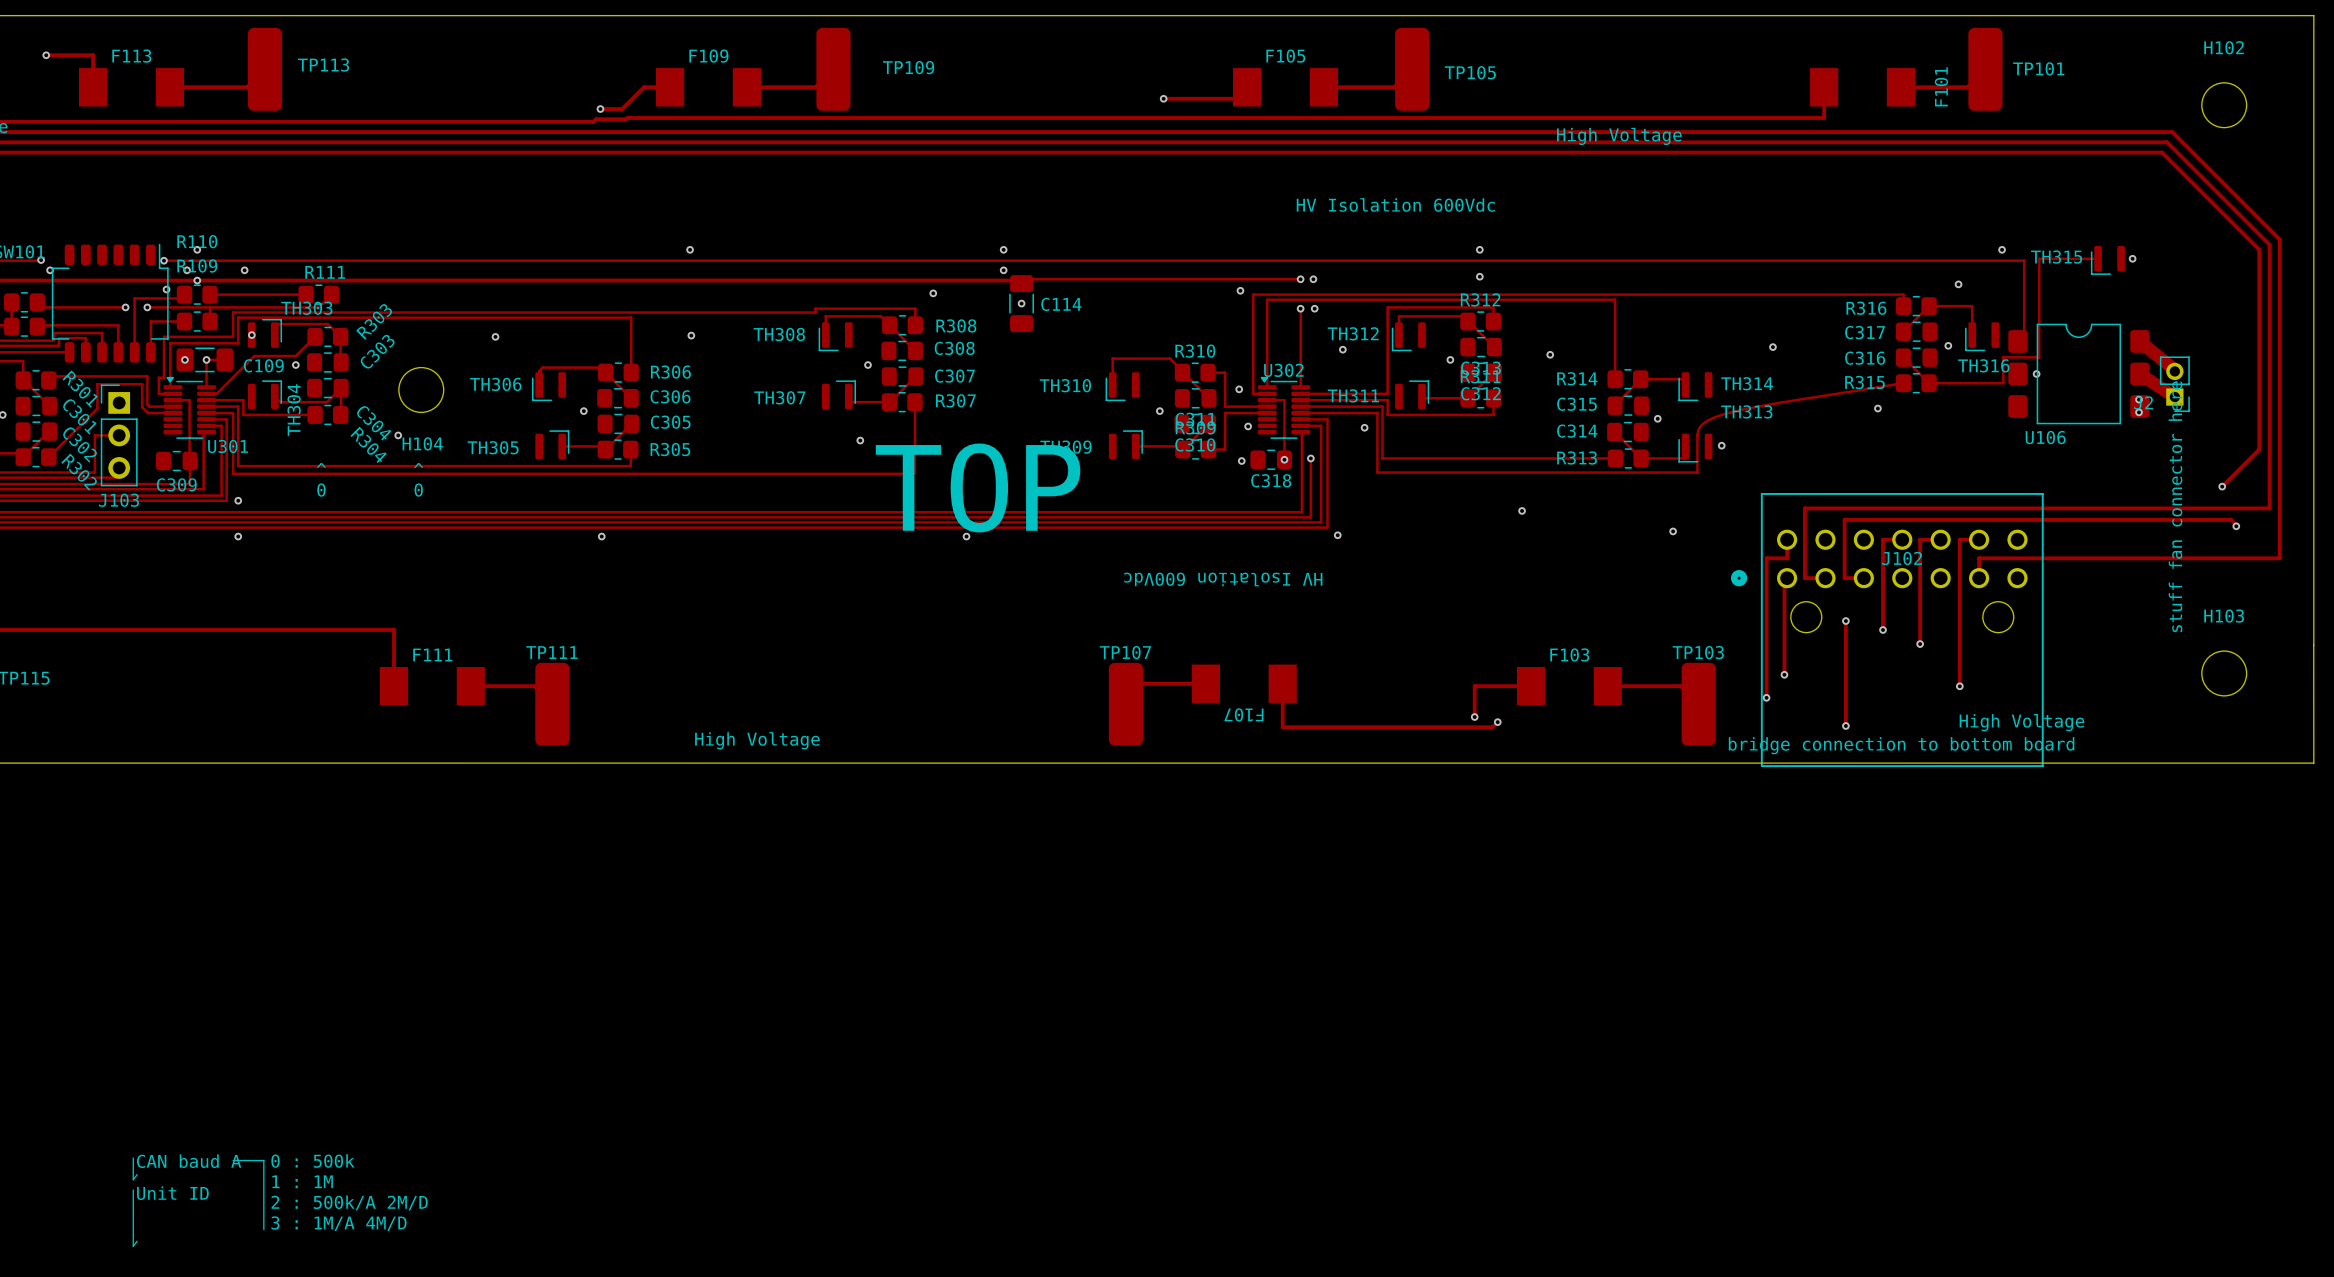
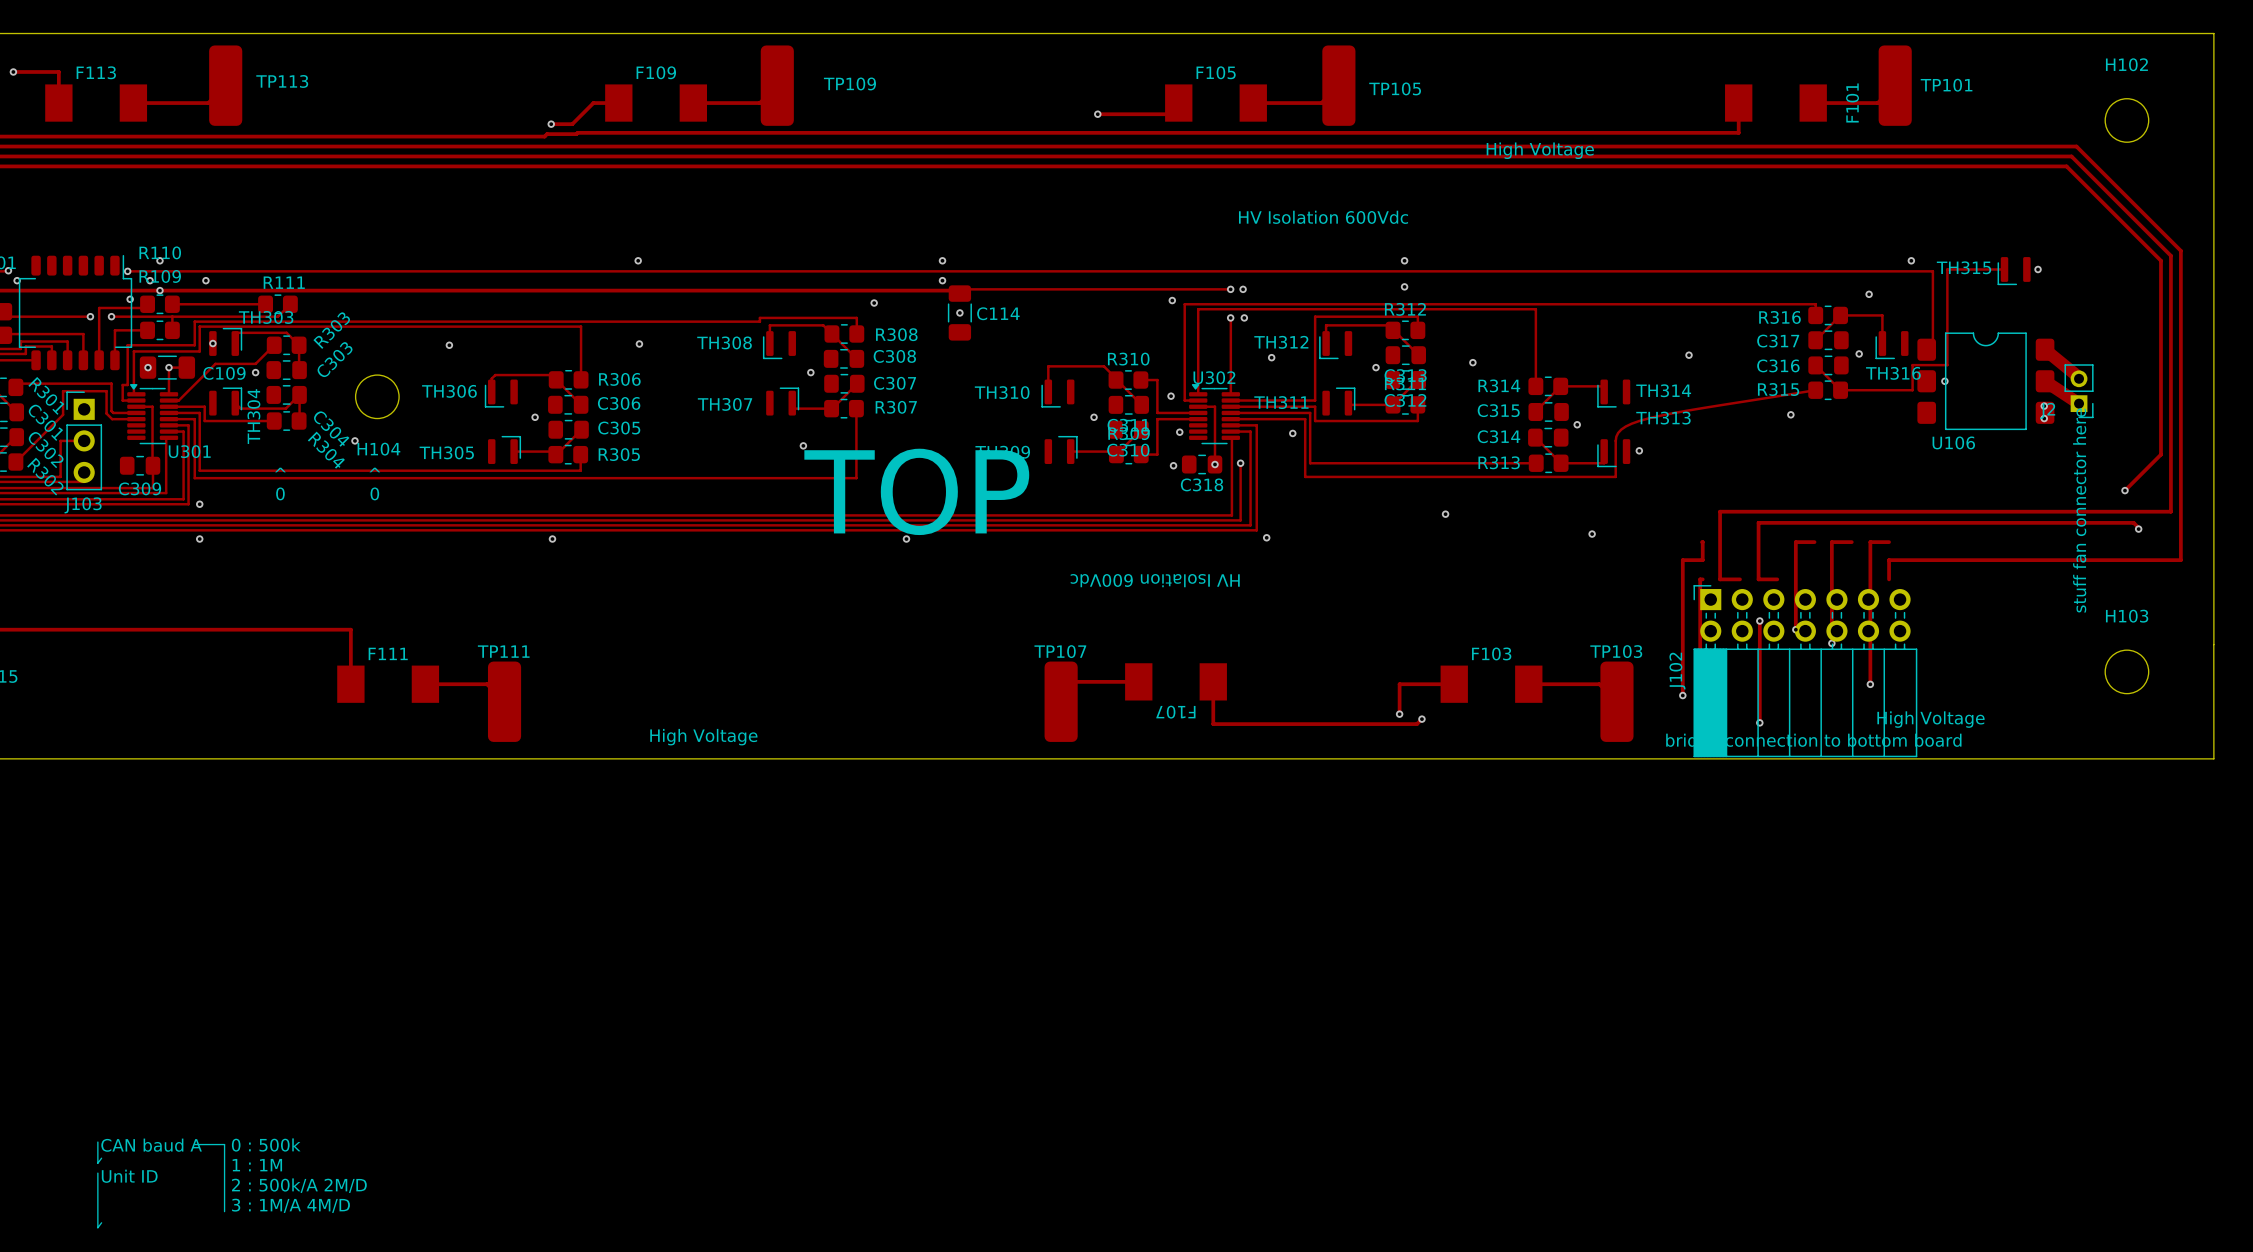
J102 footprint: [1730, 492, 2044, 768] -> [1693, 585, 1918, 758]
J102 name position: J102 (1902, 558) -> J102 (1677, 671)

